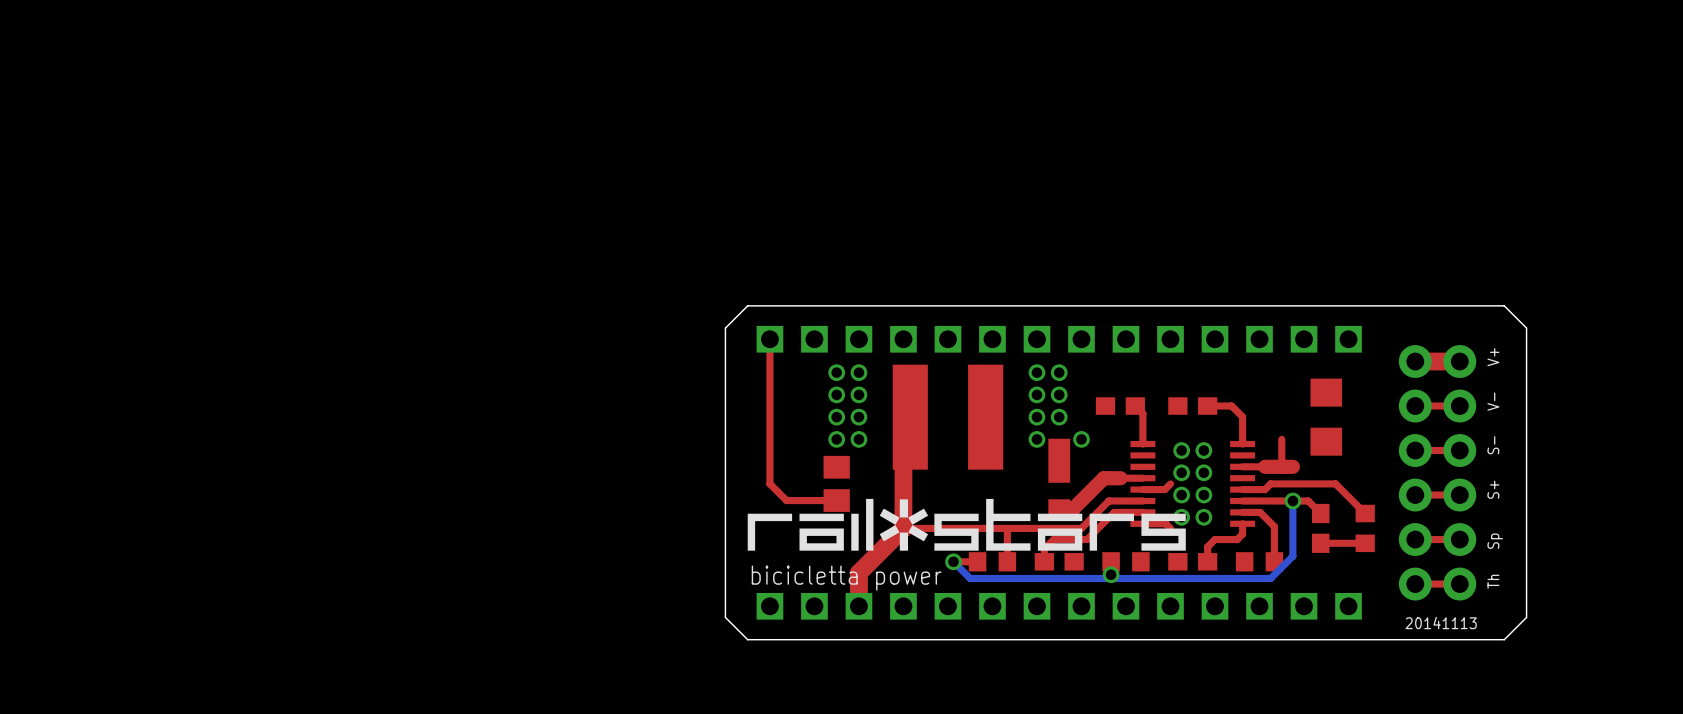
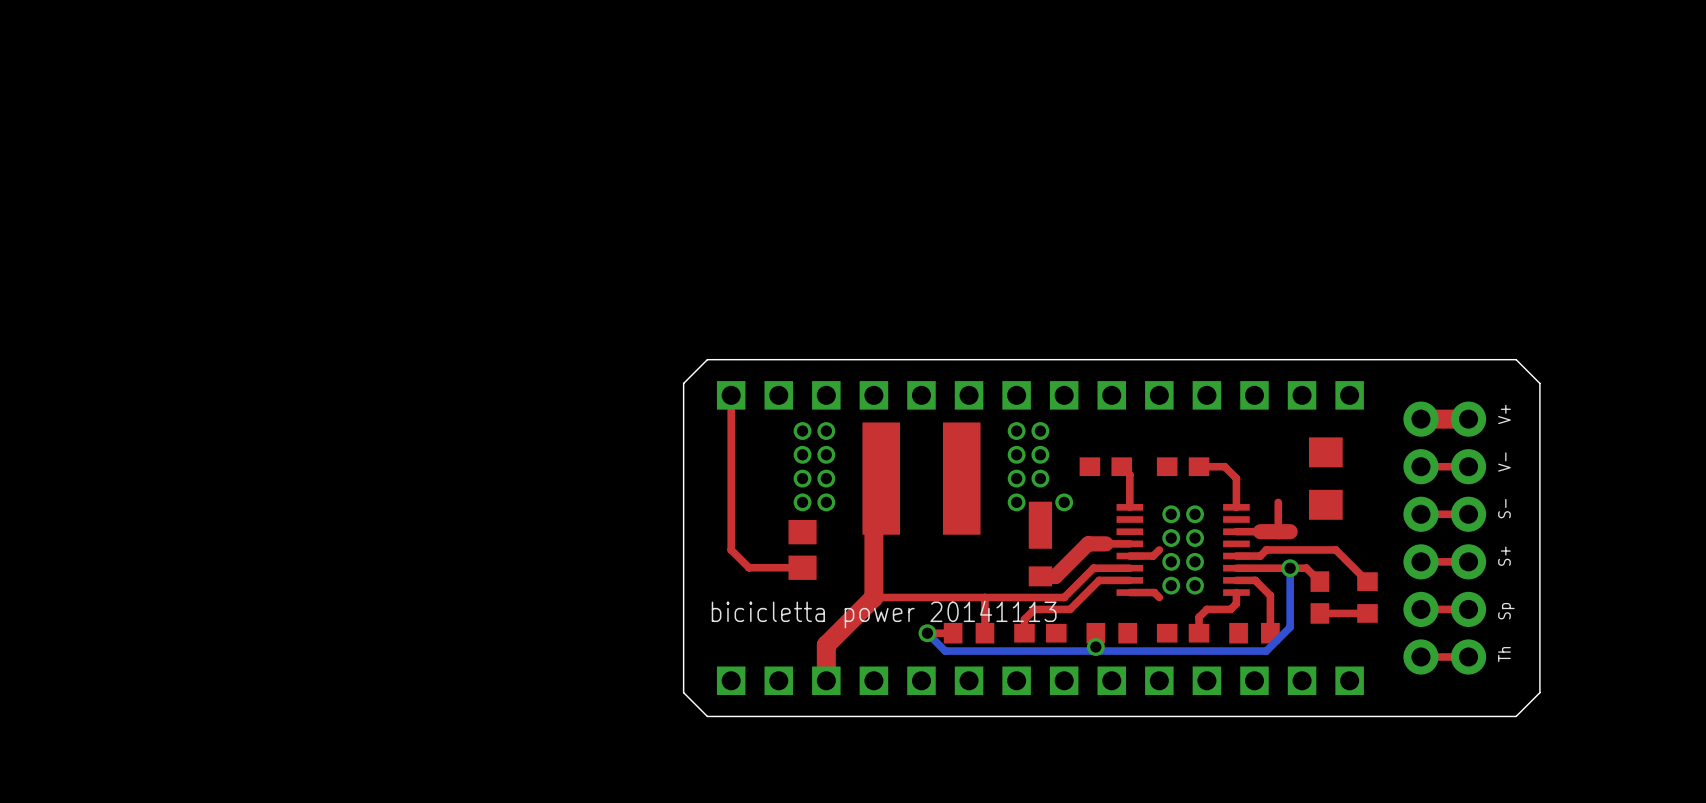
drawing: [747, 498, 1186, 551] -> none
text: bicicletta power (846, 578) -> bicicletta power 20141113 (884, 614)
text: 20141113 (1441, 622) -> none

